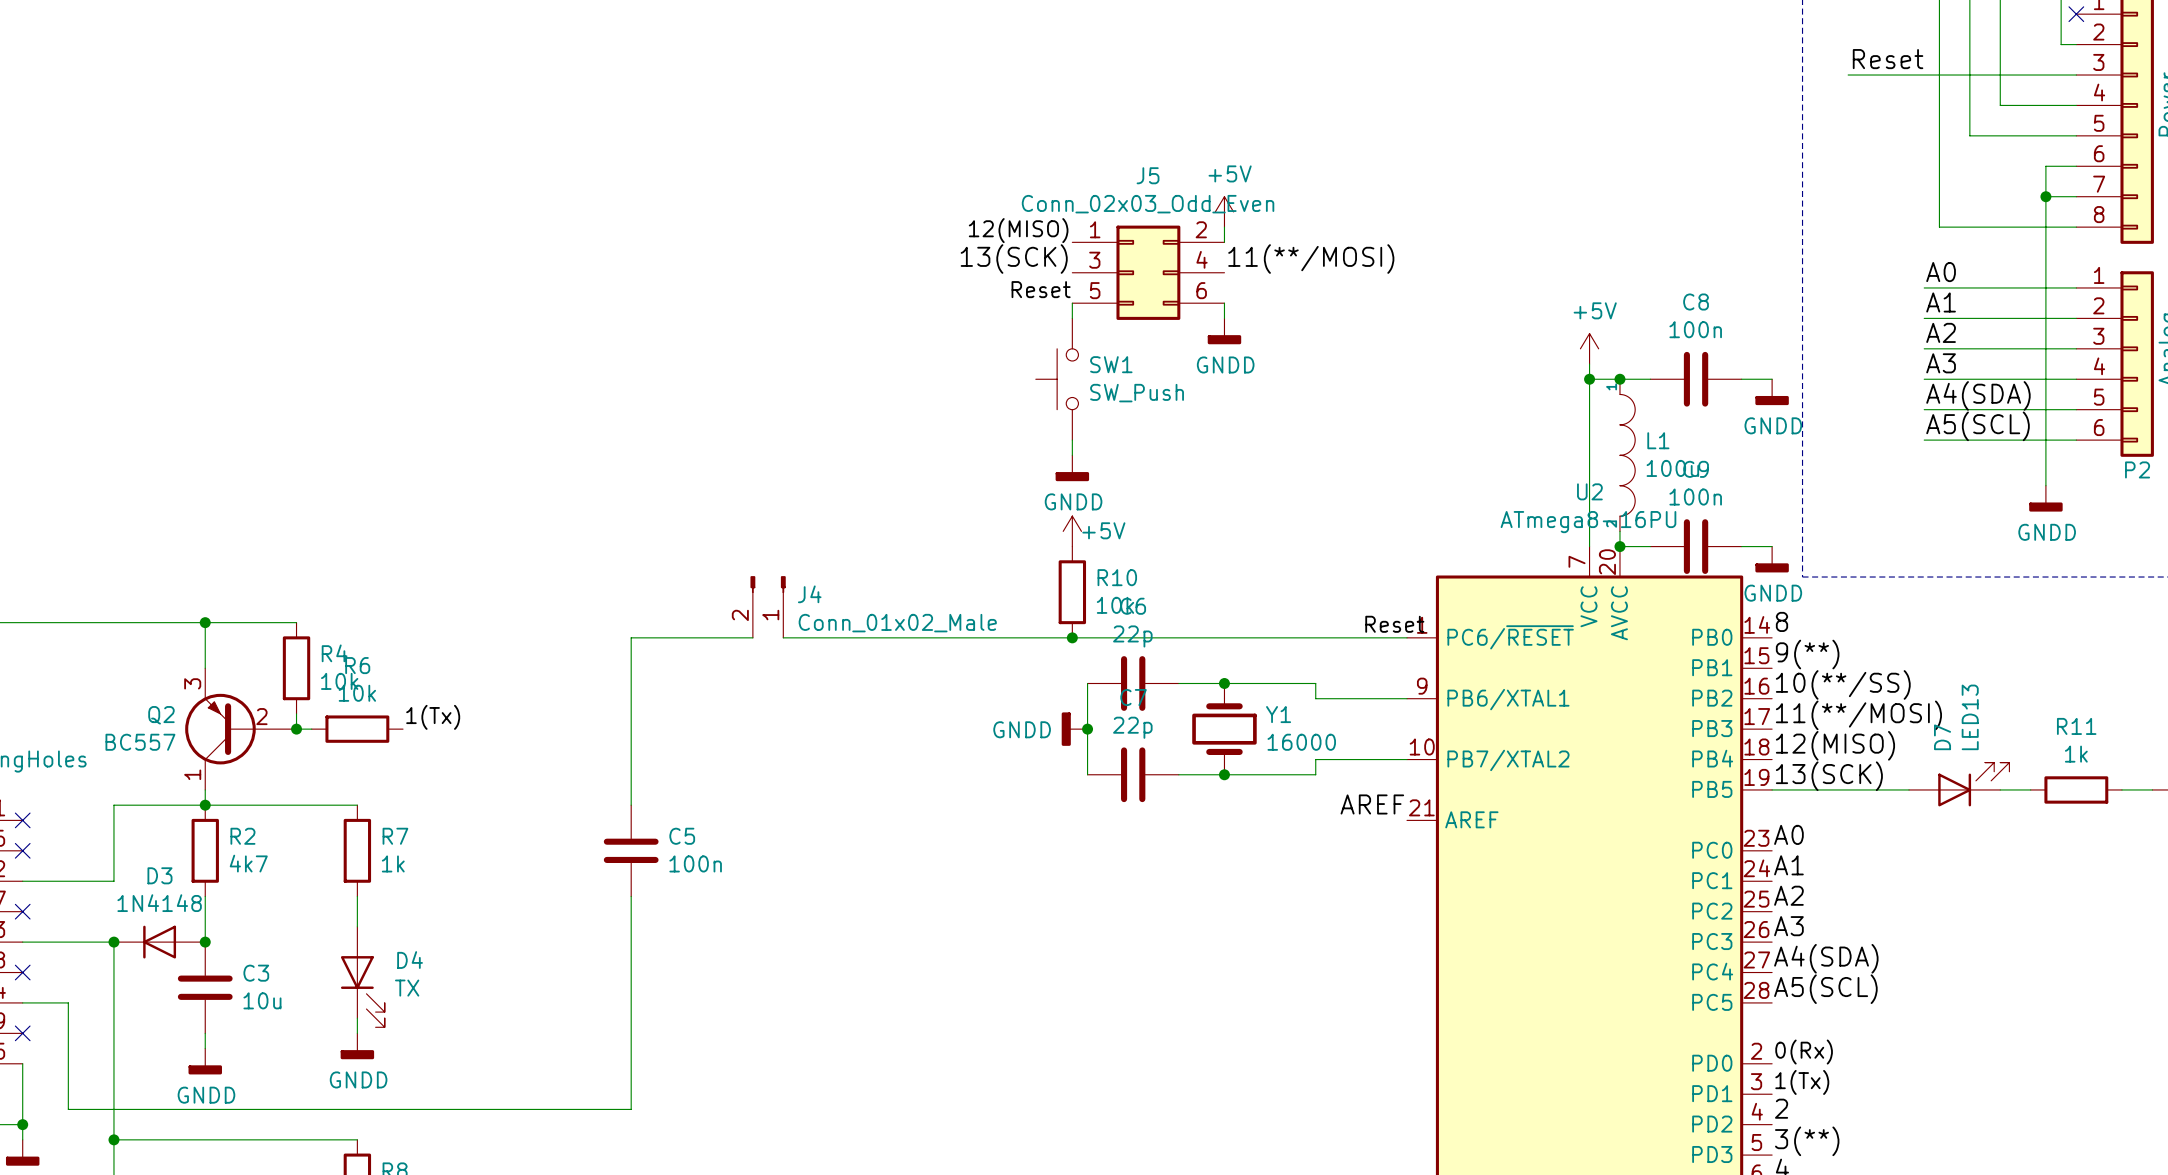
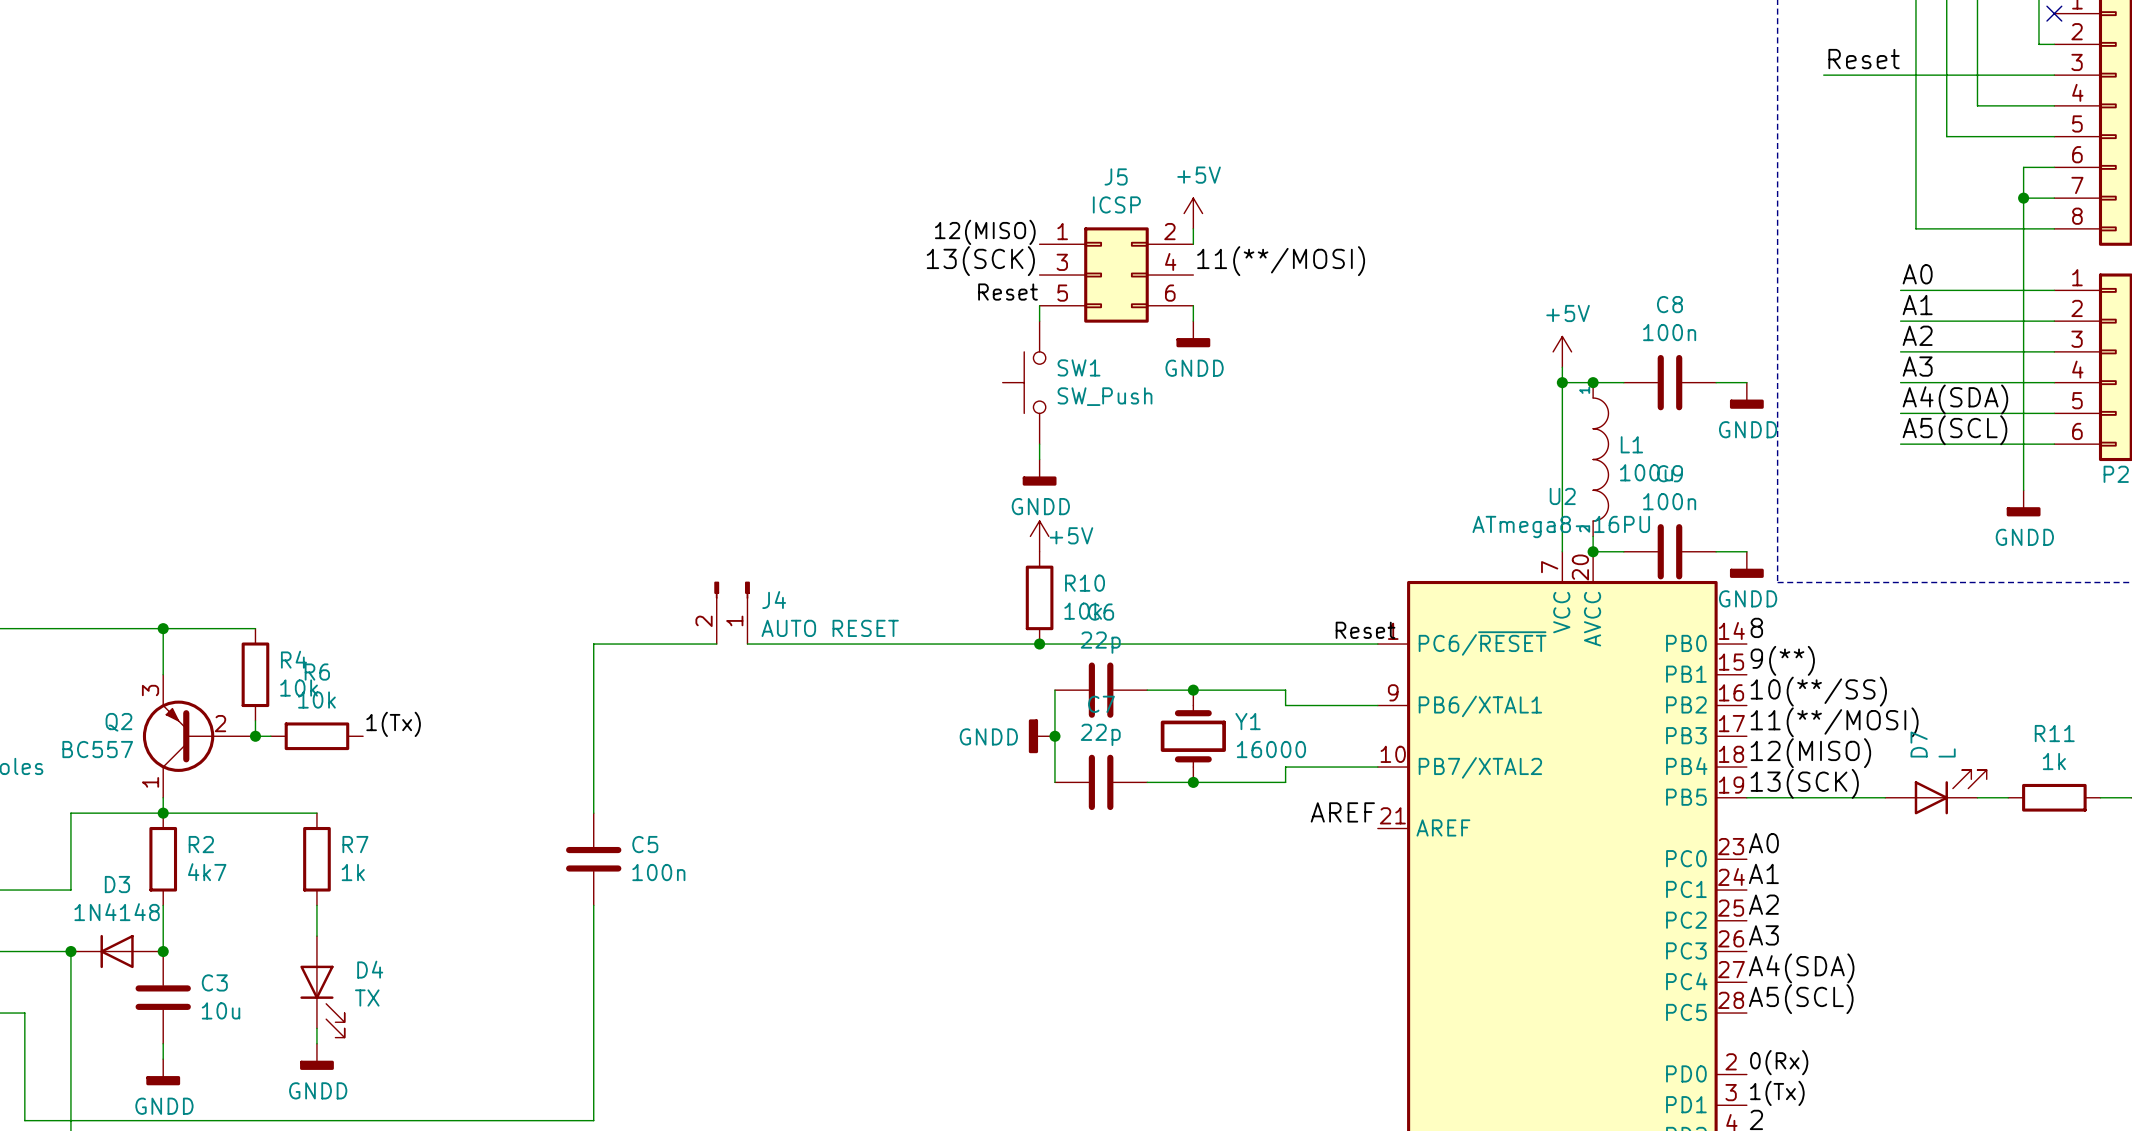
J5 value: Conn_02x03_Odd_Even (1148, 204) -> ICSP (1116, 204)
J4 value: Conn_01x02_Male (897, 623) -> AUTO RESET (830, 628)
D7 value: LED13 (1970, 717) -> L (1947, 752)

